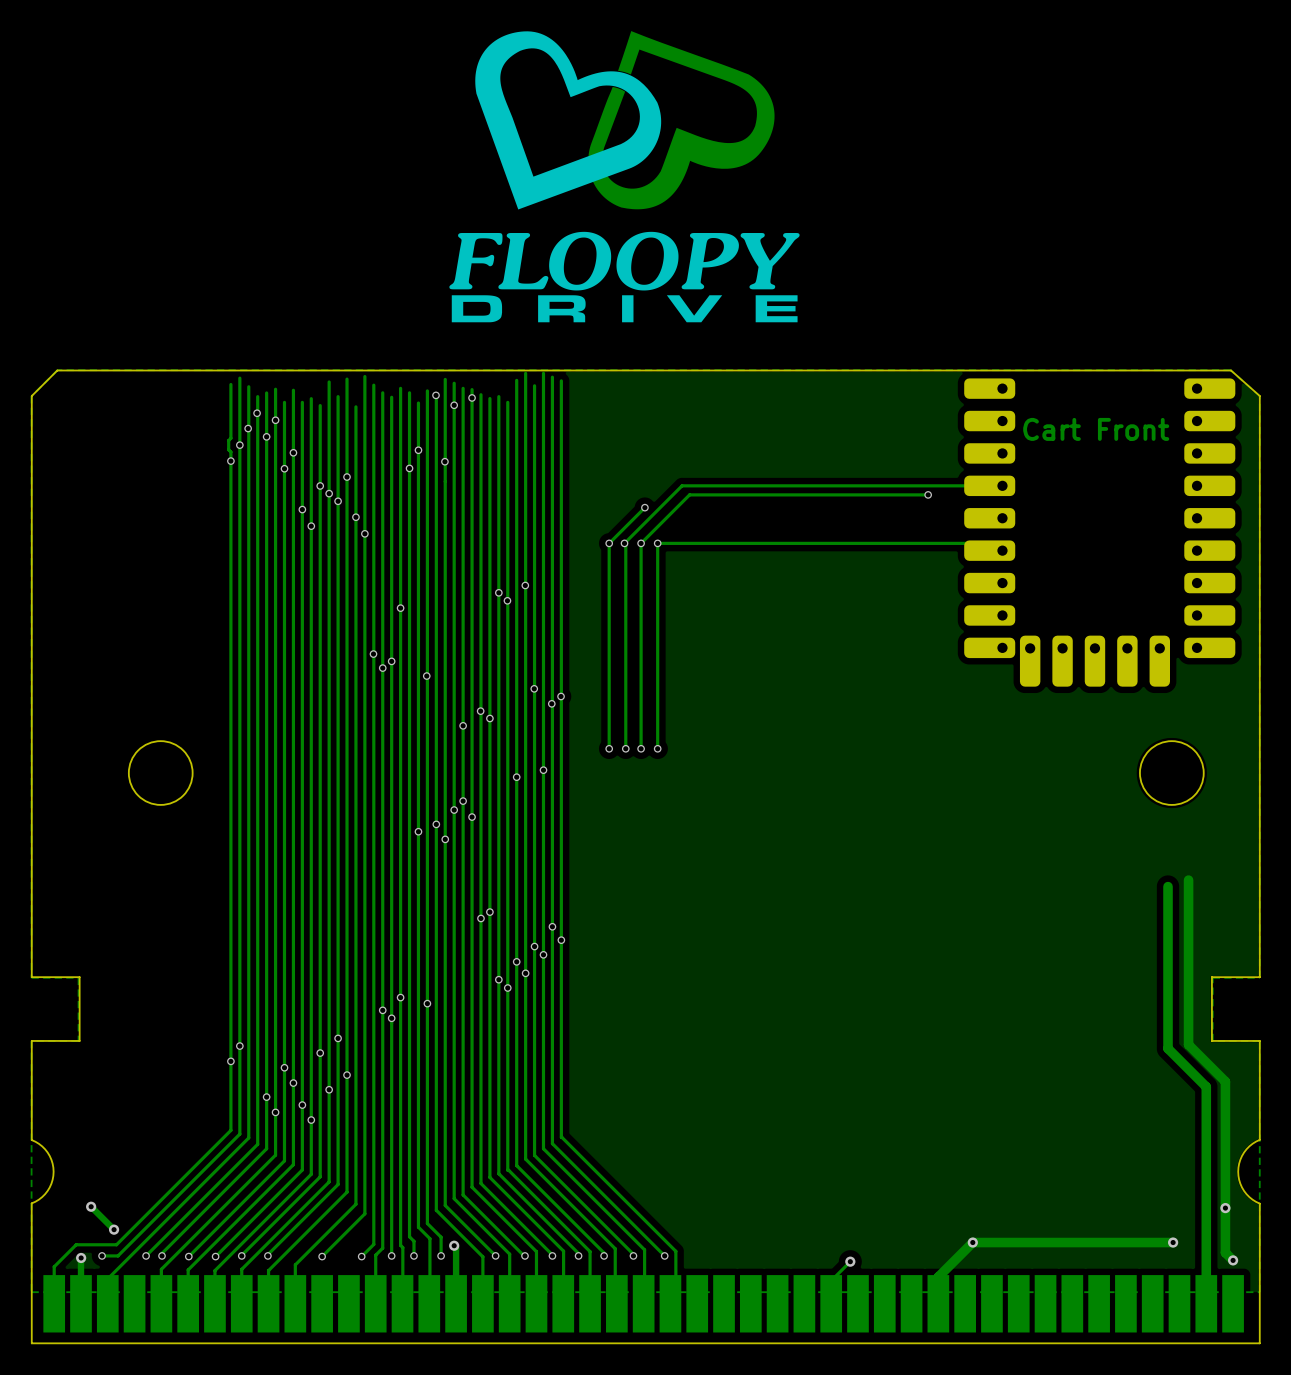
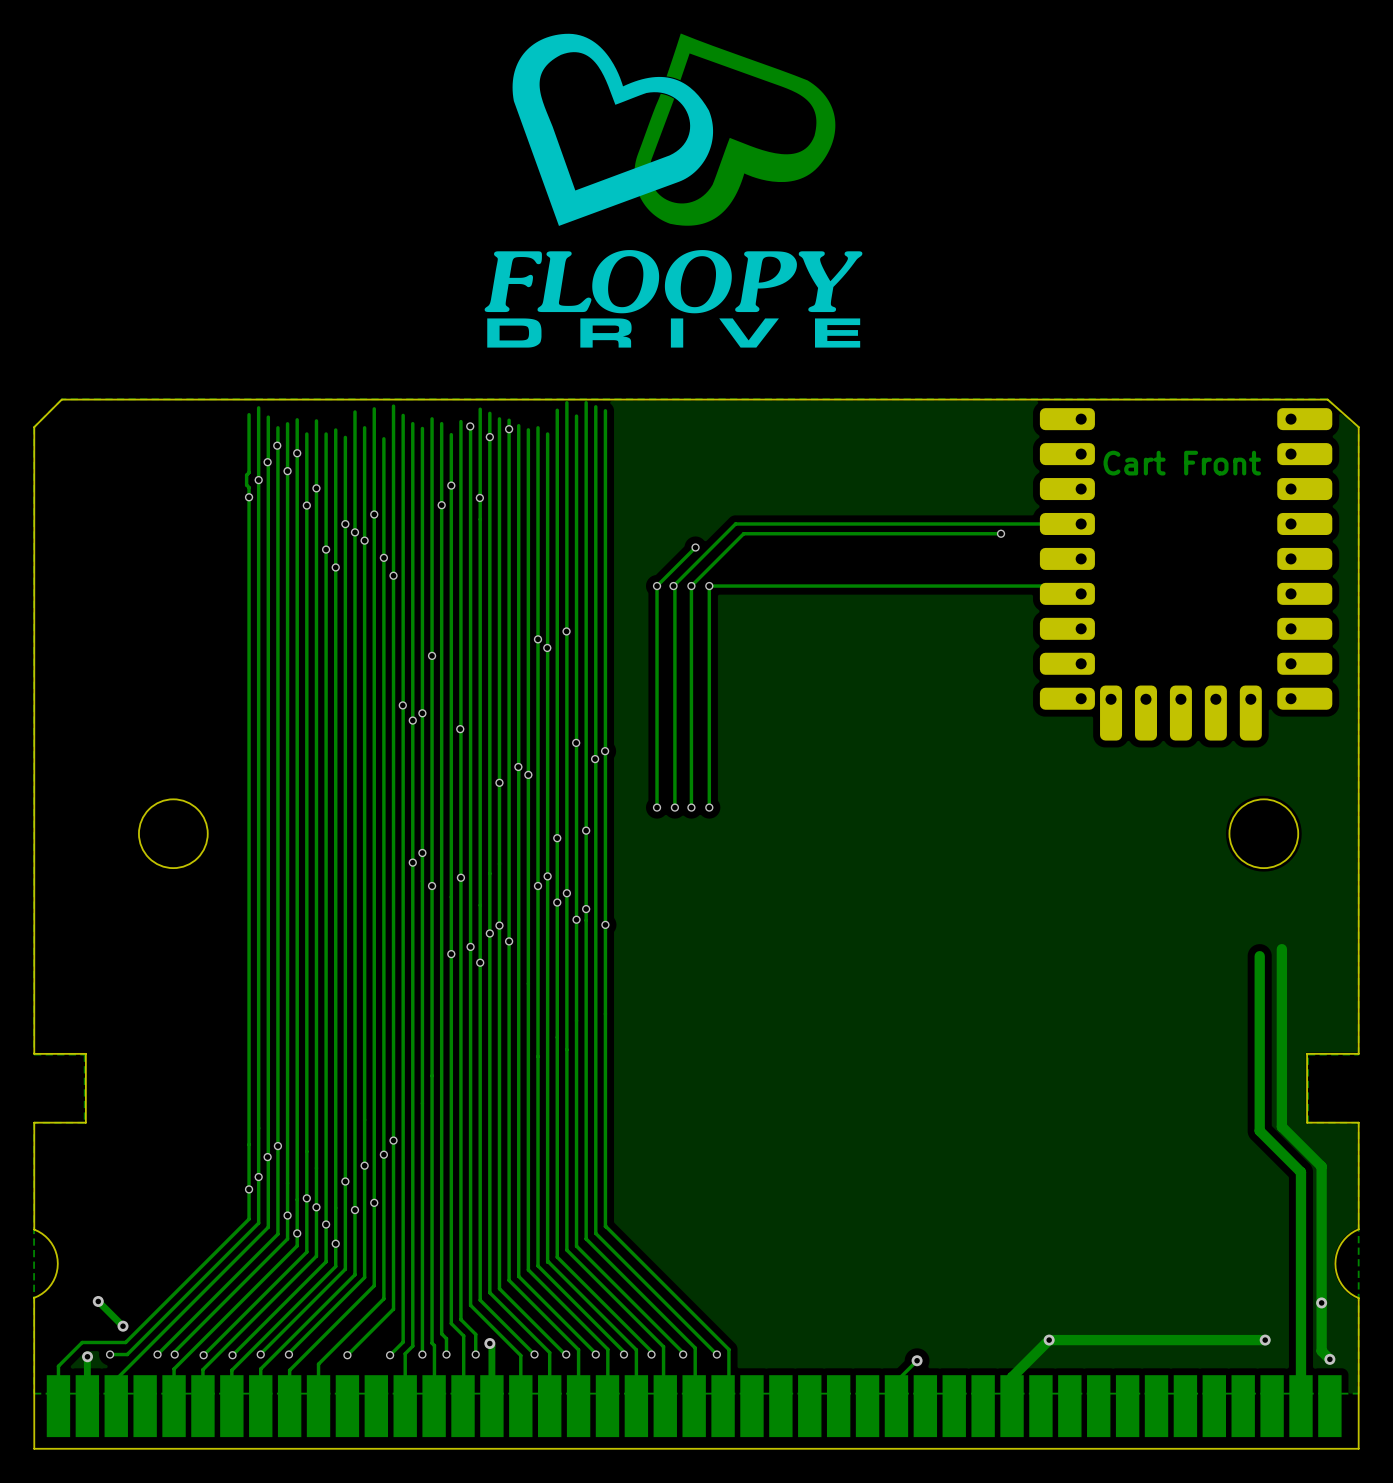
via: none -> (422, 852)
via: none -> (412, 862)
via: (463, 801) -> none
via: (454, 810) -> none
via: none -> (547, 876)
via: none -> (460, 877)
via: (472, 817) -> none
via: none -> (432, 886)
via: none -> (538, 886)
via: (436, 824) -> none
via: none -> (566, 893)
via: (418, 831) -> none
via: none -> (557, 902)
via: (445, 839) -> none
via: none -> (586, 909)
via: none -> (576, 919)
via: none -> (605, 924)
via: none -> (499, 925)
via: none -> (489, 933)
via: none -> (509, 941)
via: none -> (470, 946)
via: none -> (451, 954)
via: none -> (480, 962)
via: (489, 912) -> none
via: (480, 918) -> none
via: (552, 926) -> none
via: (561, 940) -> none
via: (534, 946) -> none
via: (543, 954) -> none
via: (516, 961) -> none
via: (525, 973) -> none
via: (498, 979) -> none
via: (507, 988) -> none
via: (400, 997) -> none
via: (427, 1003) -> none
via: (382, 1010) -> none
via: (391, 1018) -> none
via: (338, 1038) -> none
via: (239, 1046) -> none
via: (320, 1053) -> none
via: none -> (393, 1140)
via: (230, 1061) -> none
via: none -> (277, 1146)
via: (284, 1067) -> none
via: none -> (383, 1154)
via: none -> (267, 1157)
via: (347, 1075) -> none
via: none -> (364, 1165)
via: (293, 1083) -> none
via: (329, 1089) -> none
via: none -> (258, 1177)
via: none -> (345, 1181)
via: (266, 1097) -> none
via: none -> (249, 1189)
via: (302, 1105) -> none
via: none -> (306, 1198)
via: (275, 1112) -> none
via: none -> (374, 1202)
via: none -> (316, 1207)
via: (311, 1120) -> none
via: none -> (354, 1210)
via: none -> (287, 1215)
via: none -> (326, 1224)
via: none -> (297, 1233)
via: none -> (335, 1243)

